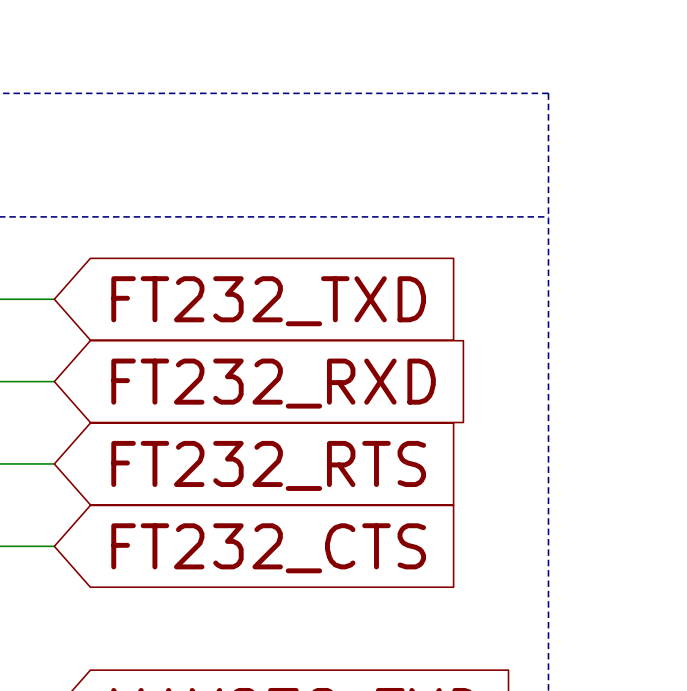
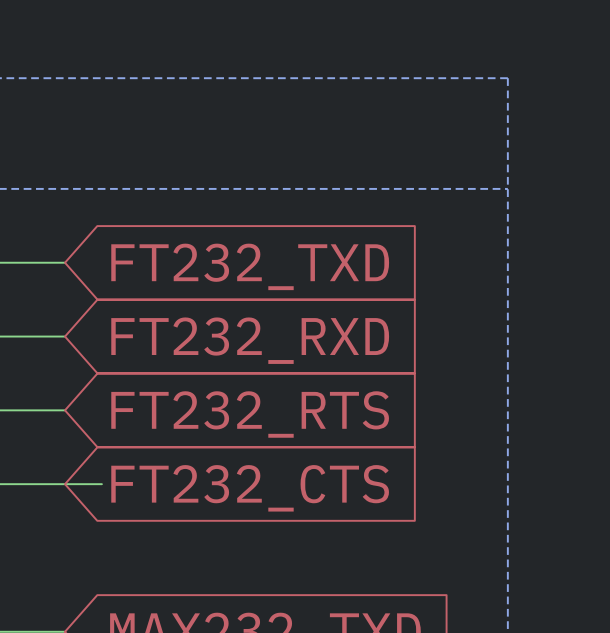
wire: none -> (64, 484) (101, 484)

